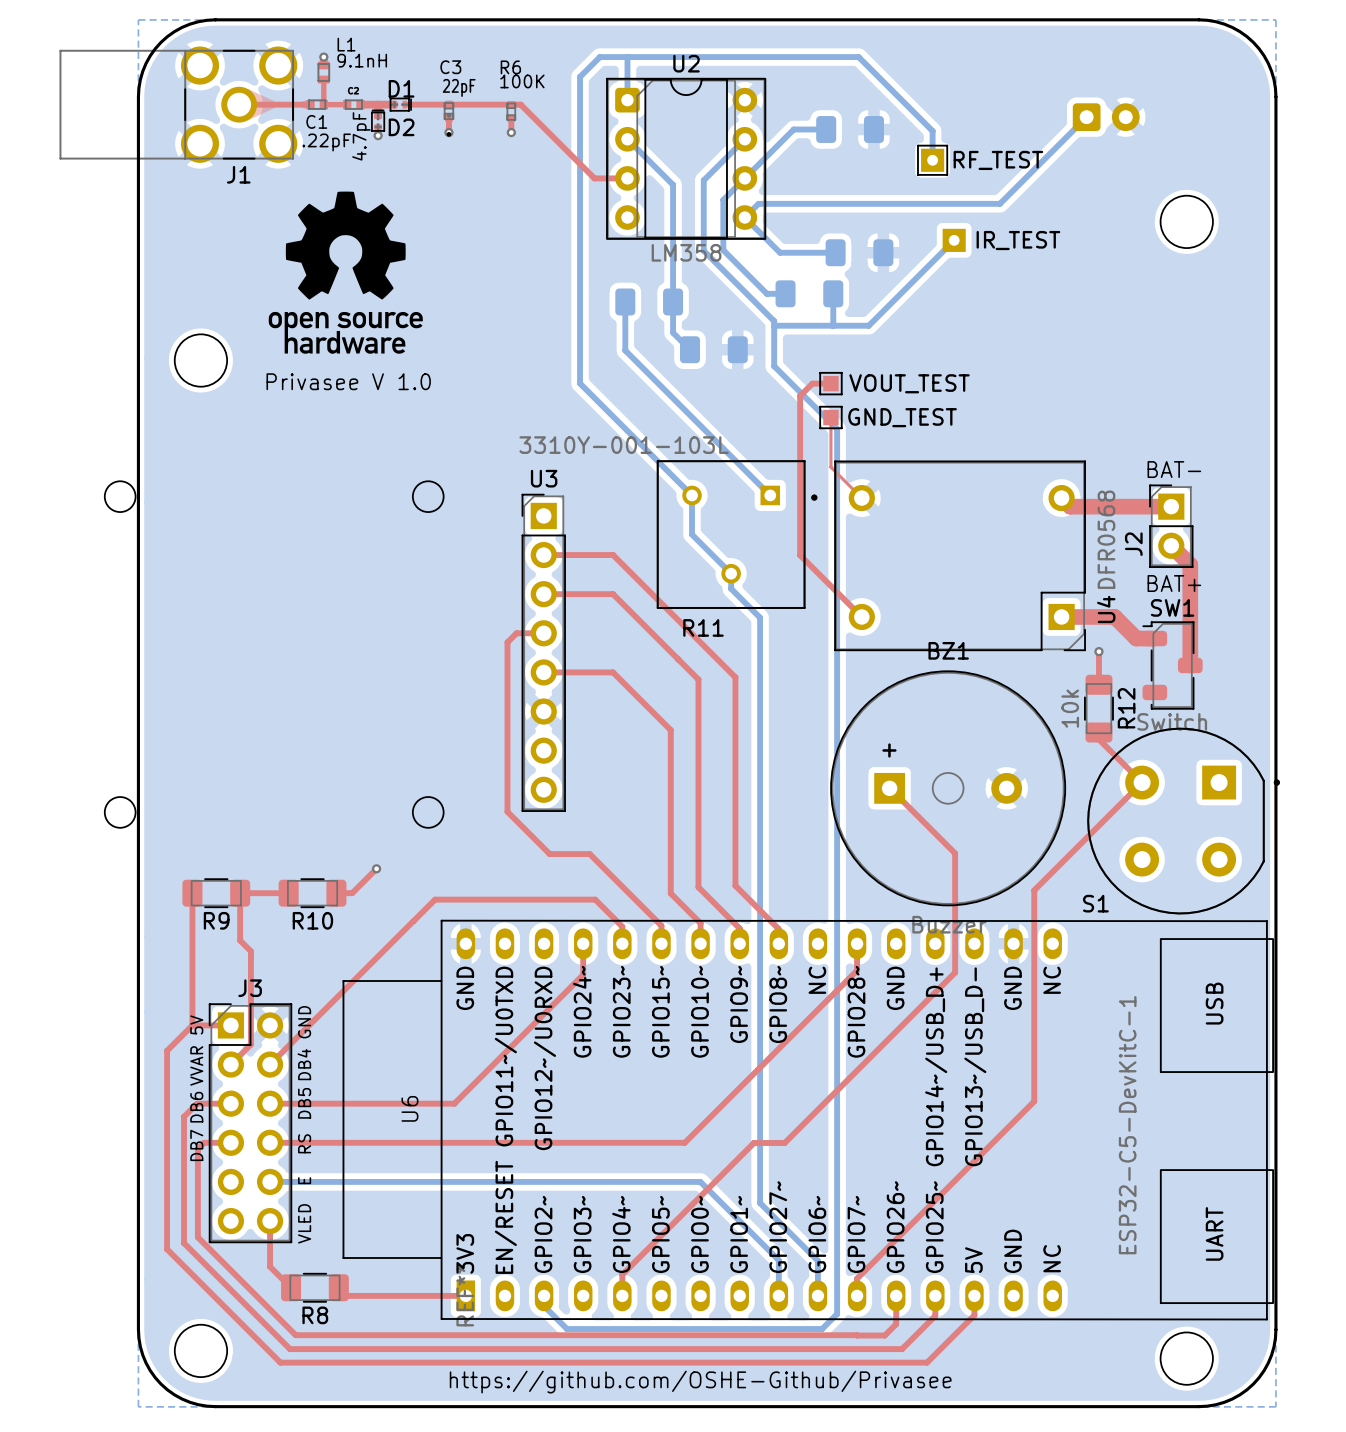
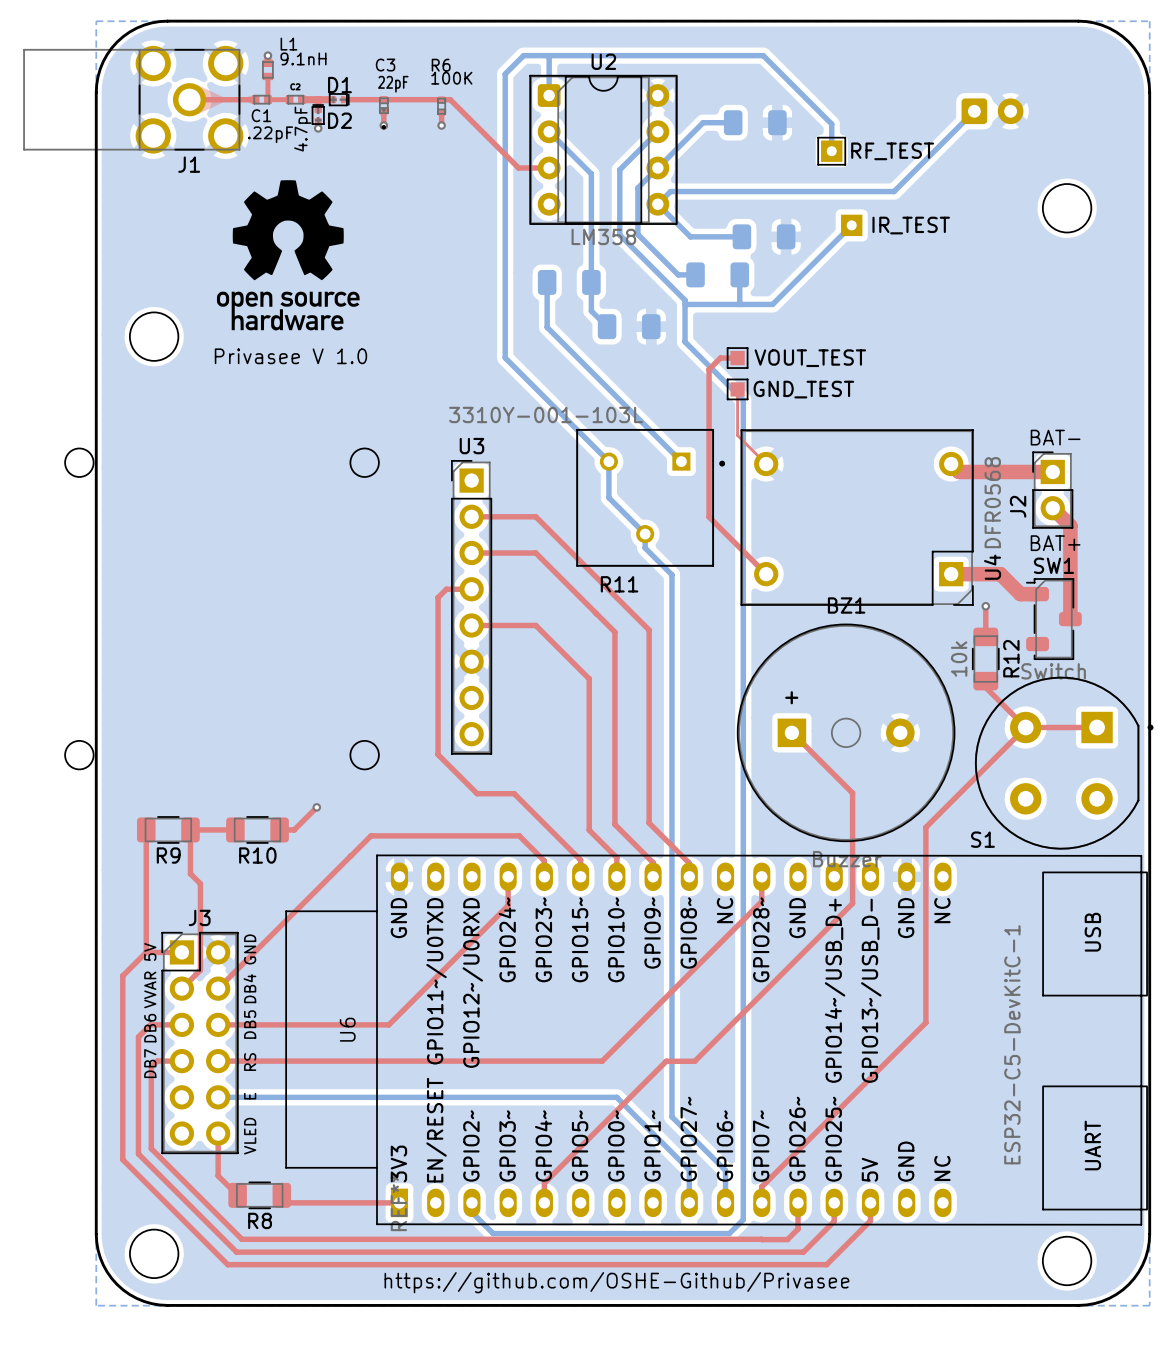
top track: none -> (1025, 727) (1097, 727)

